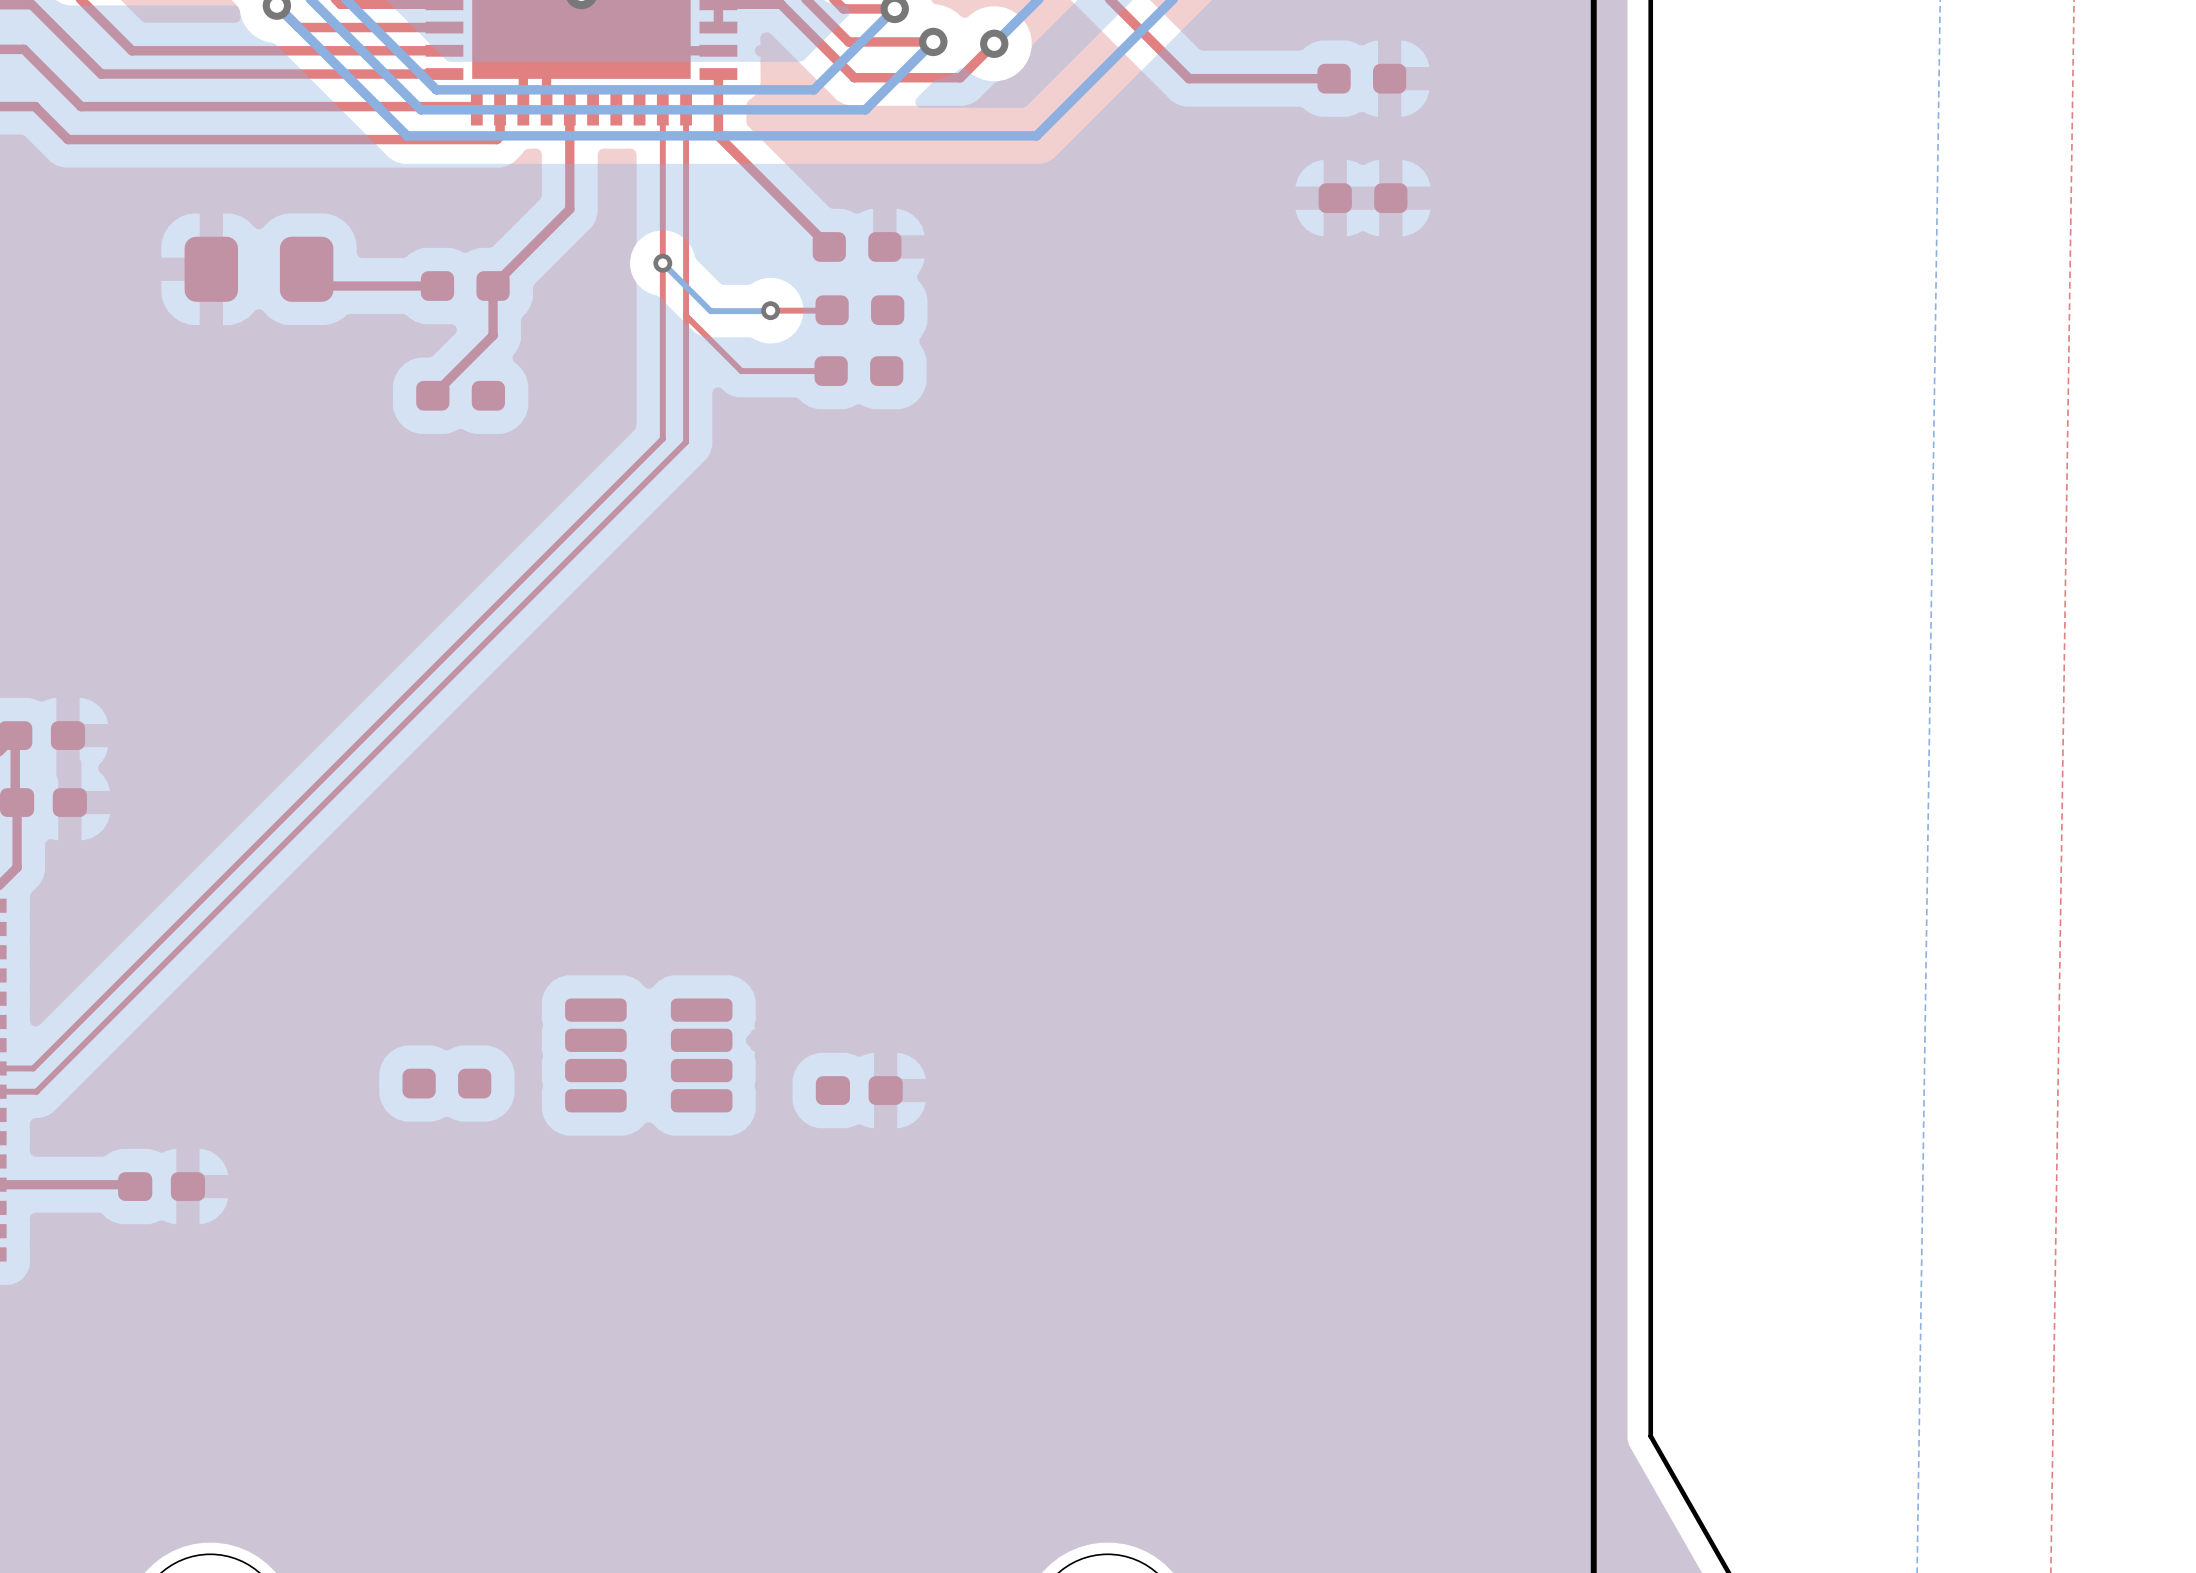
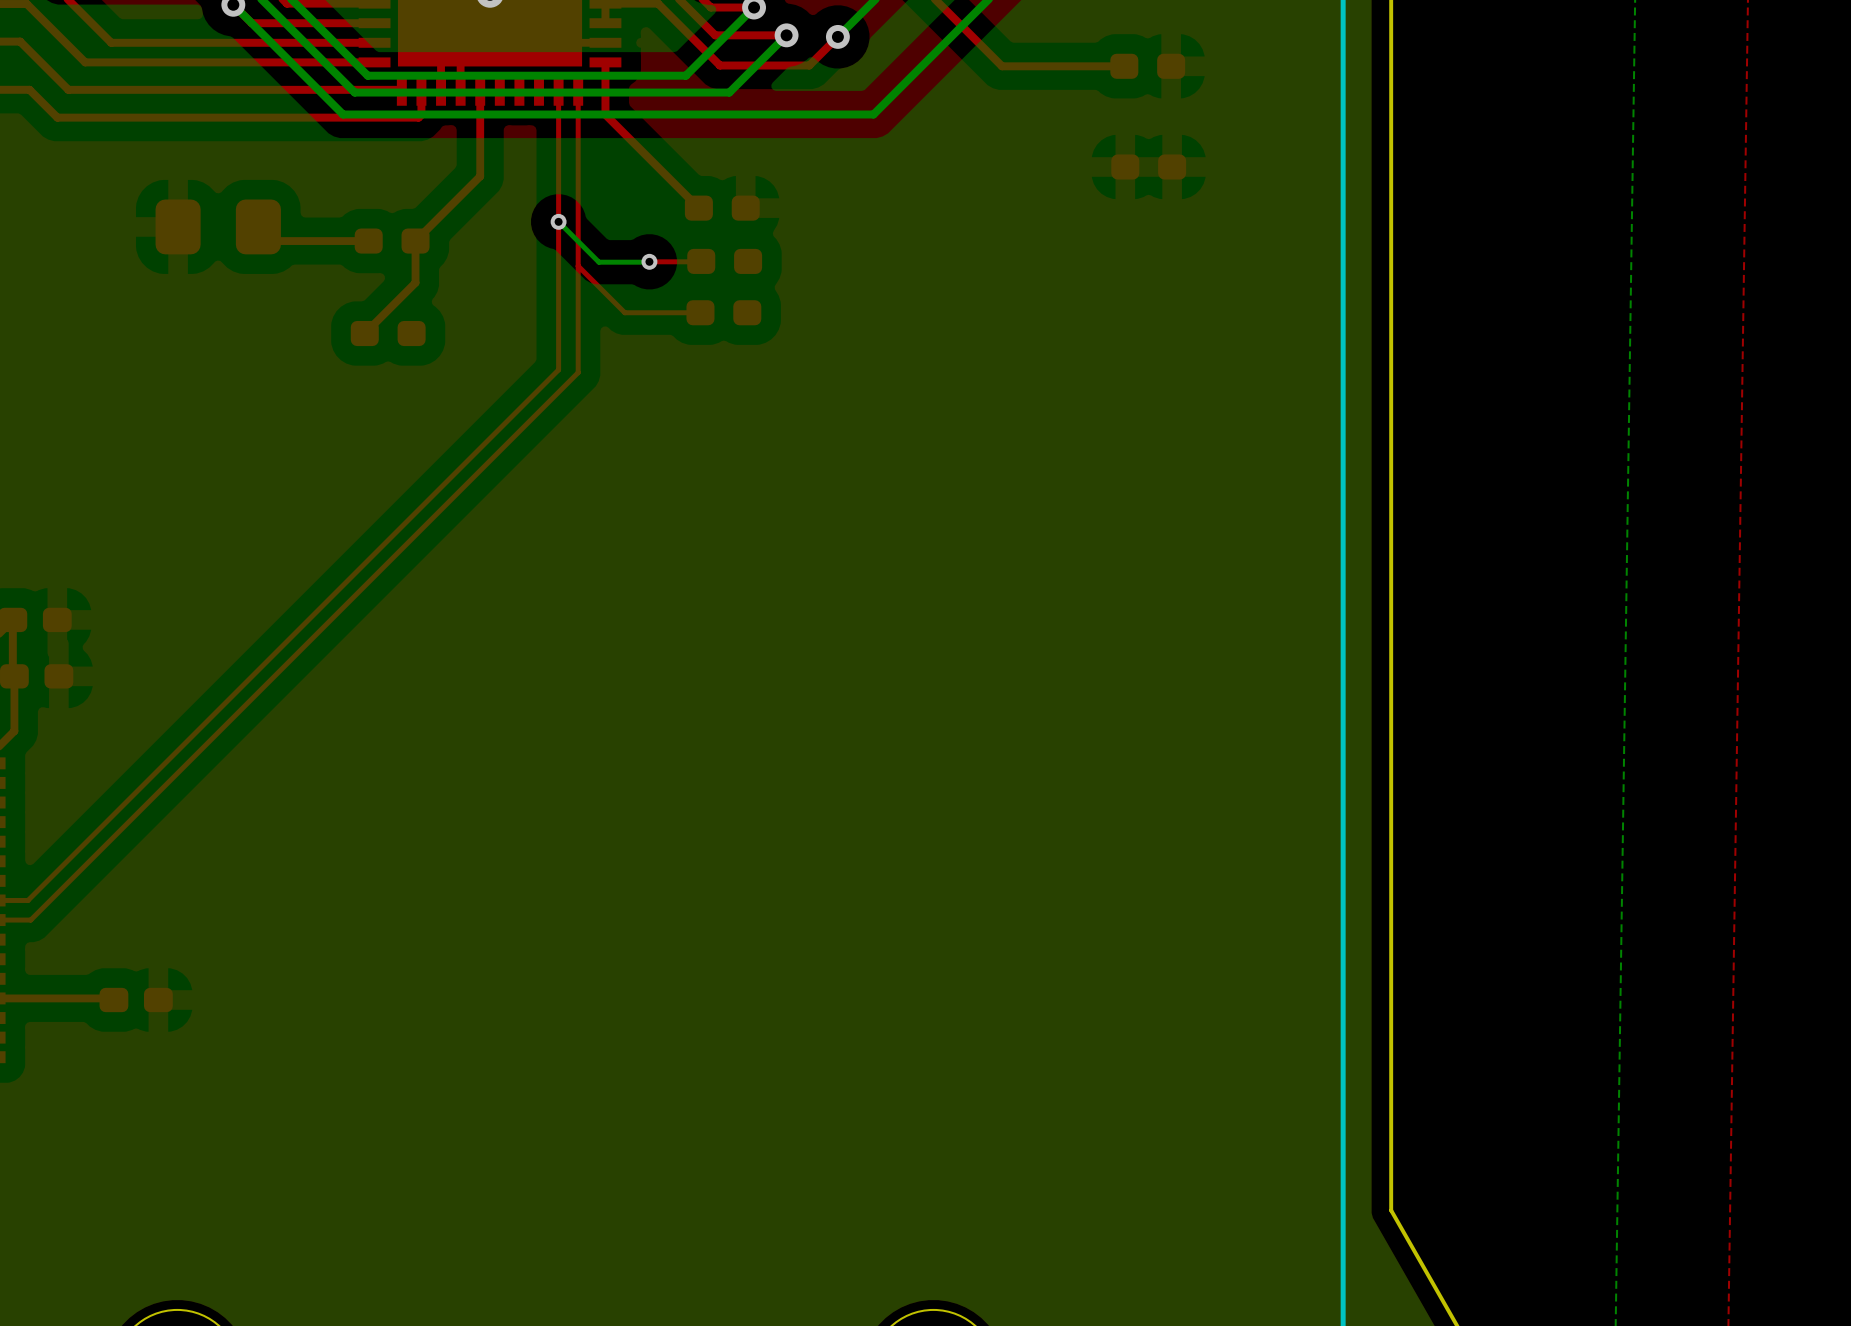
part: (648, 1055) -> none
part: (446, 1083) -> none
part: (859, 1090) -> none

